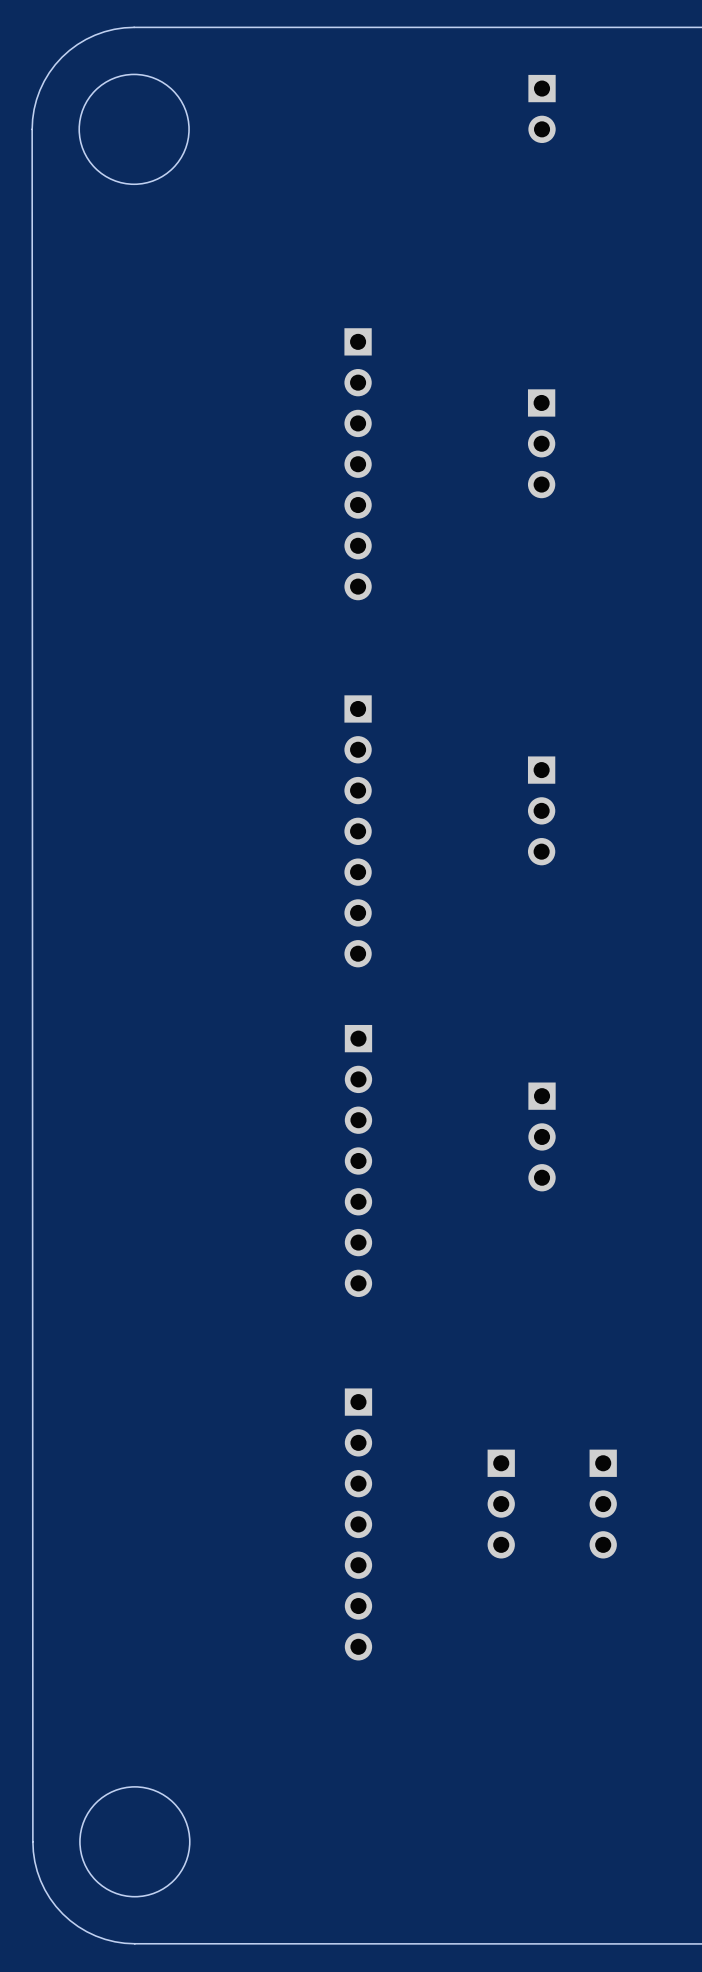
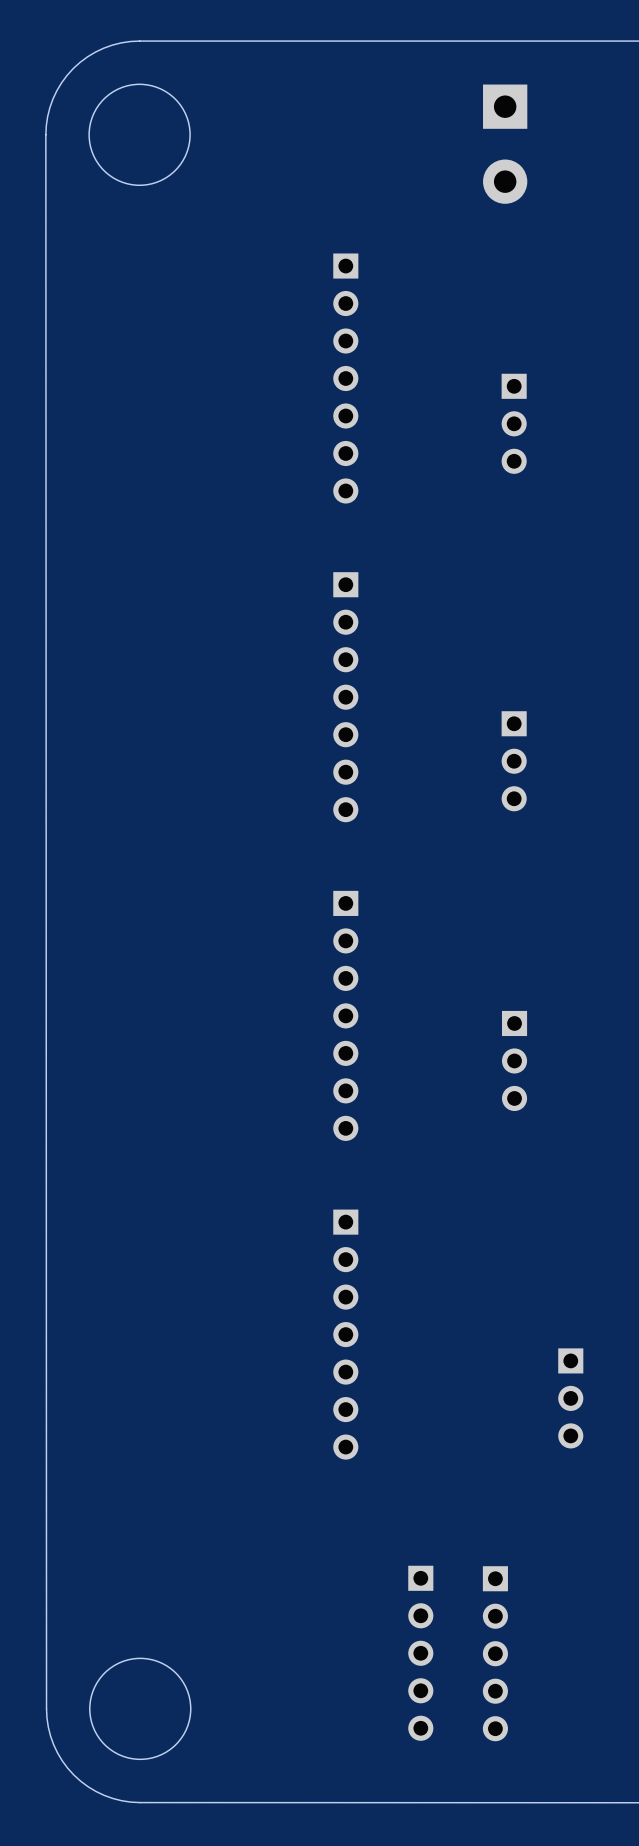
part: (542, 108) -> none
part: none -> (505, 144)
part position: (358, 464) -> (345, 378)
part position: (358, 831) -> (345, 697)
part position: (358, 1160) -> (345, 1015)
part: (501, 1504) -> none
part position: (358, 1524) -> (345, 1334)
part: none -> (420, 1653)
part: none -> (495, 1653)

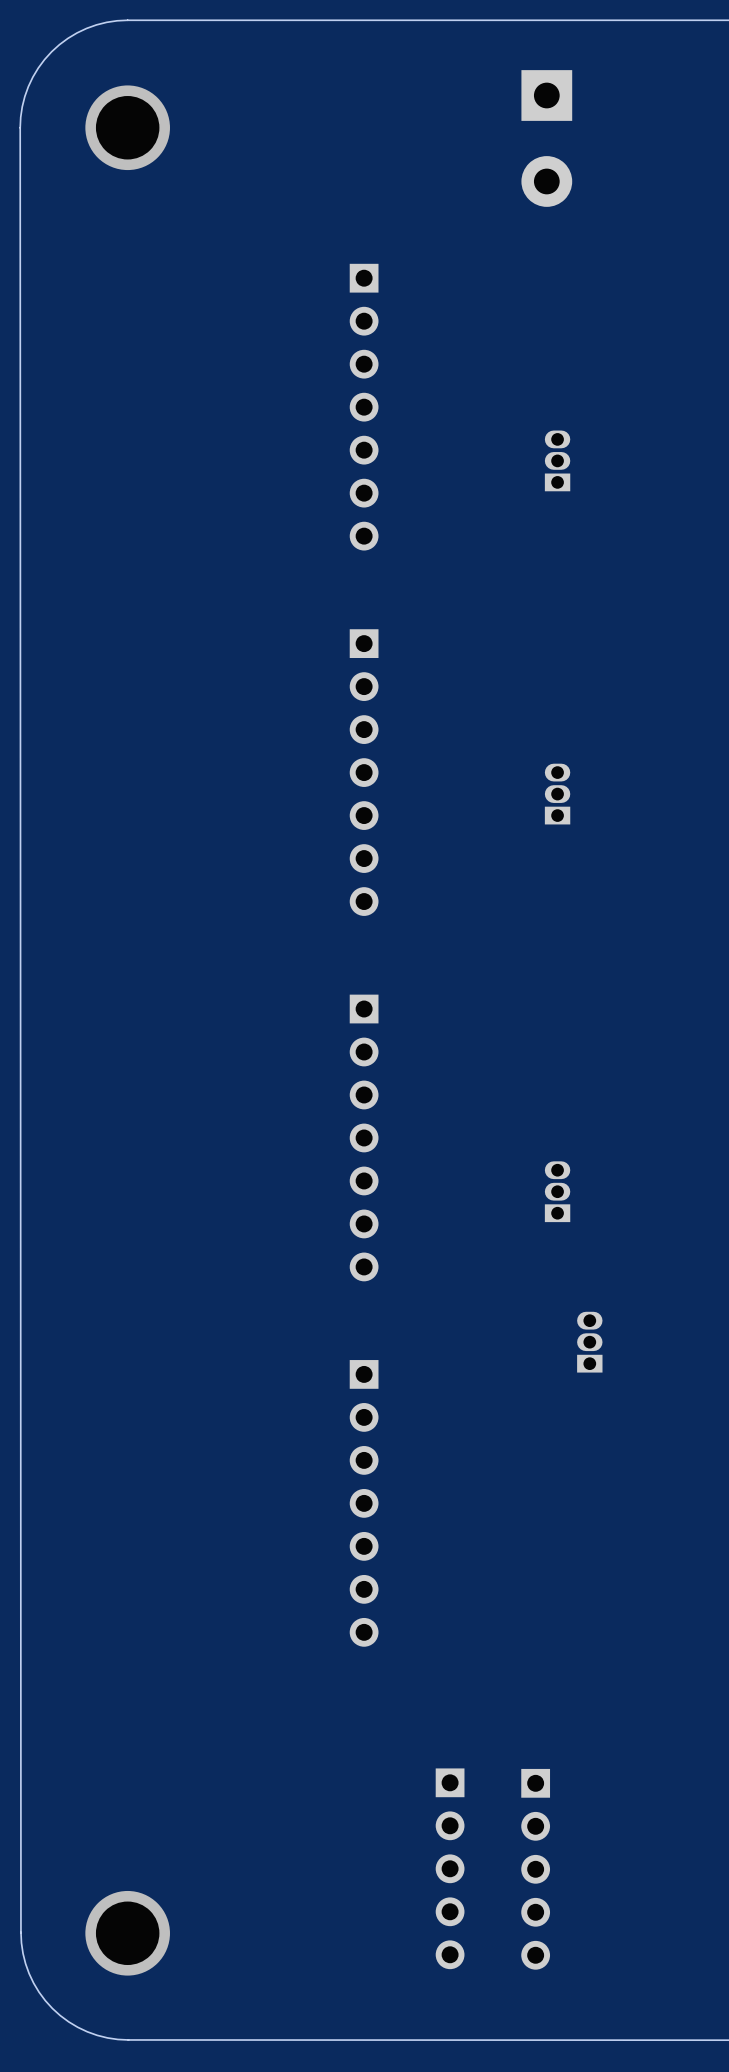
round board edge: [88, 83, 191, 187] -> none
via: none -> (127, 127)
part footprint: [501, 373, 527, 474] -> [544, 430, 571, 492]
part: none -> (557, 794)
part: (514, 761) -> none
part footprint: [501, 1010, 528, 1112] -> [544, 1161, 571, 1223]
part: none -> (589, 1342)
part: (570, 1398) -> none
round board edge: [89, 1657, 192, 1761] -> none
via: none -> (127, 1933)

